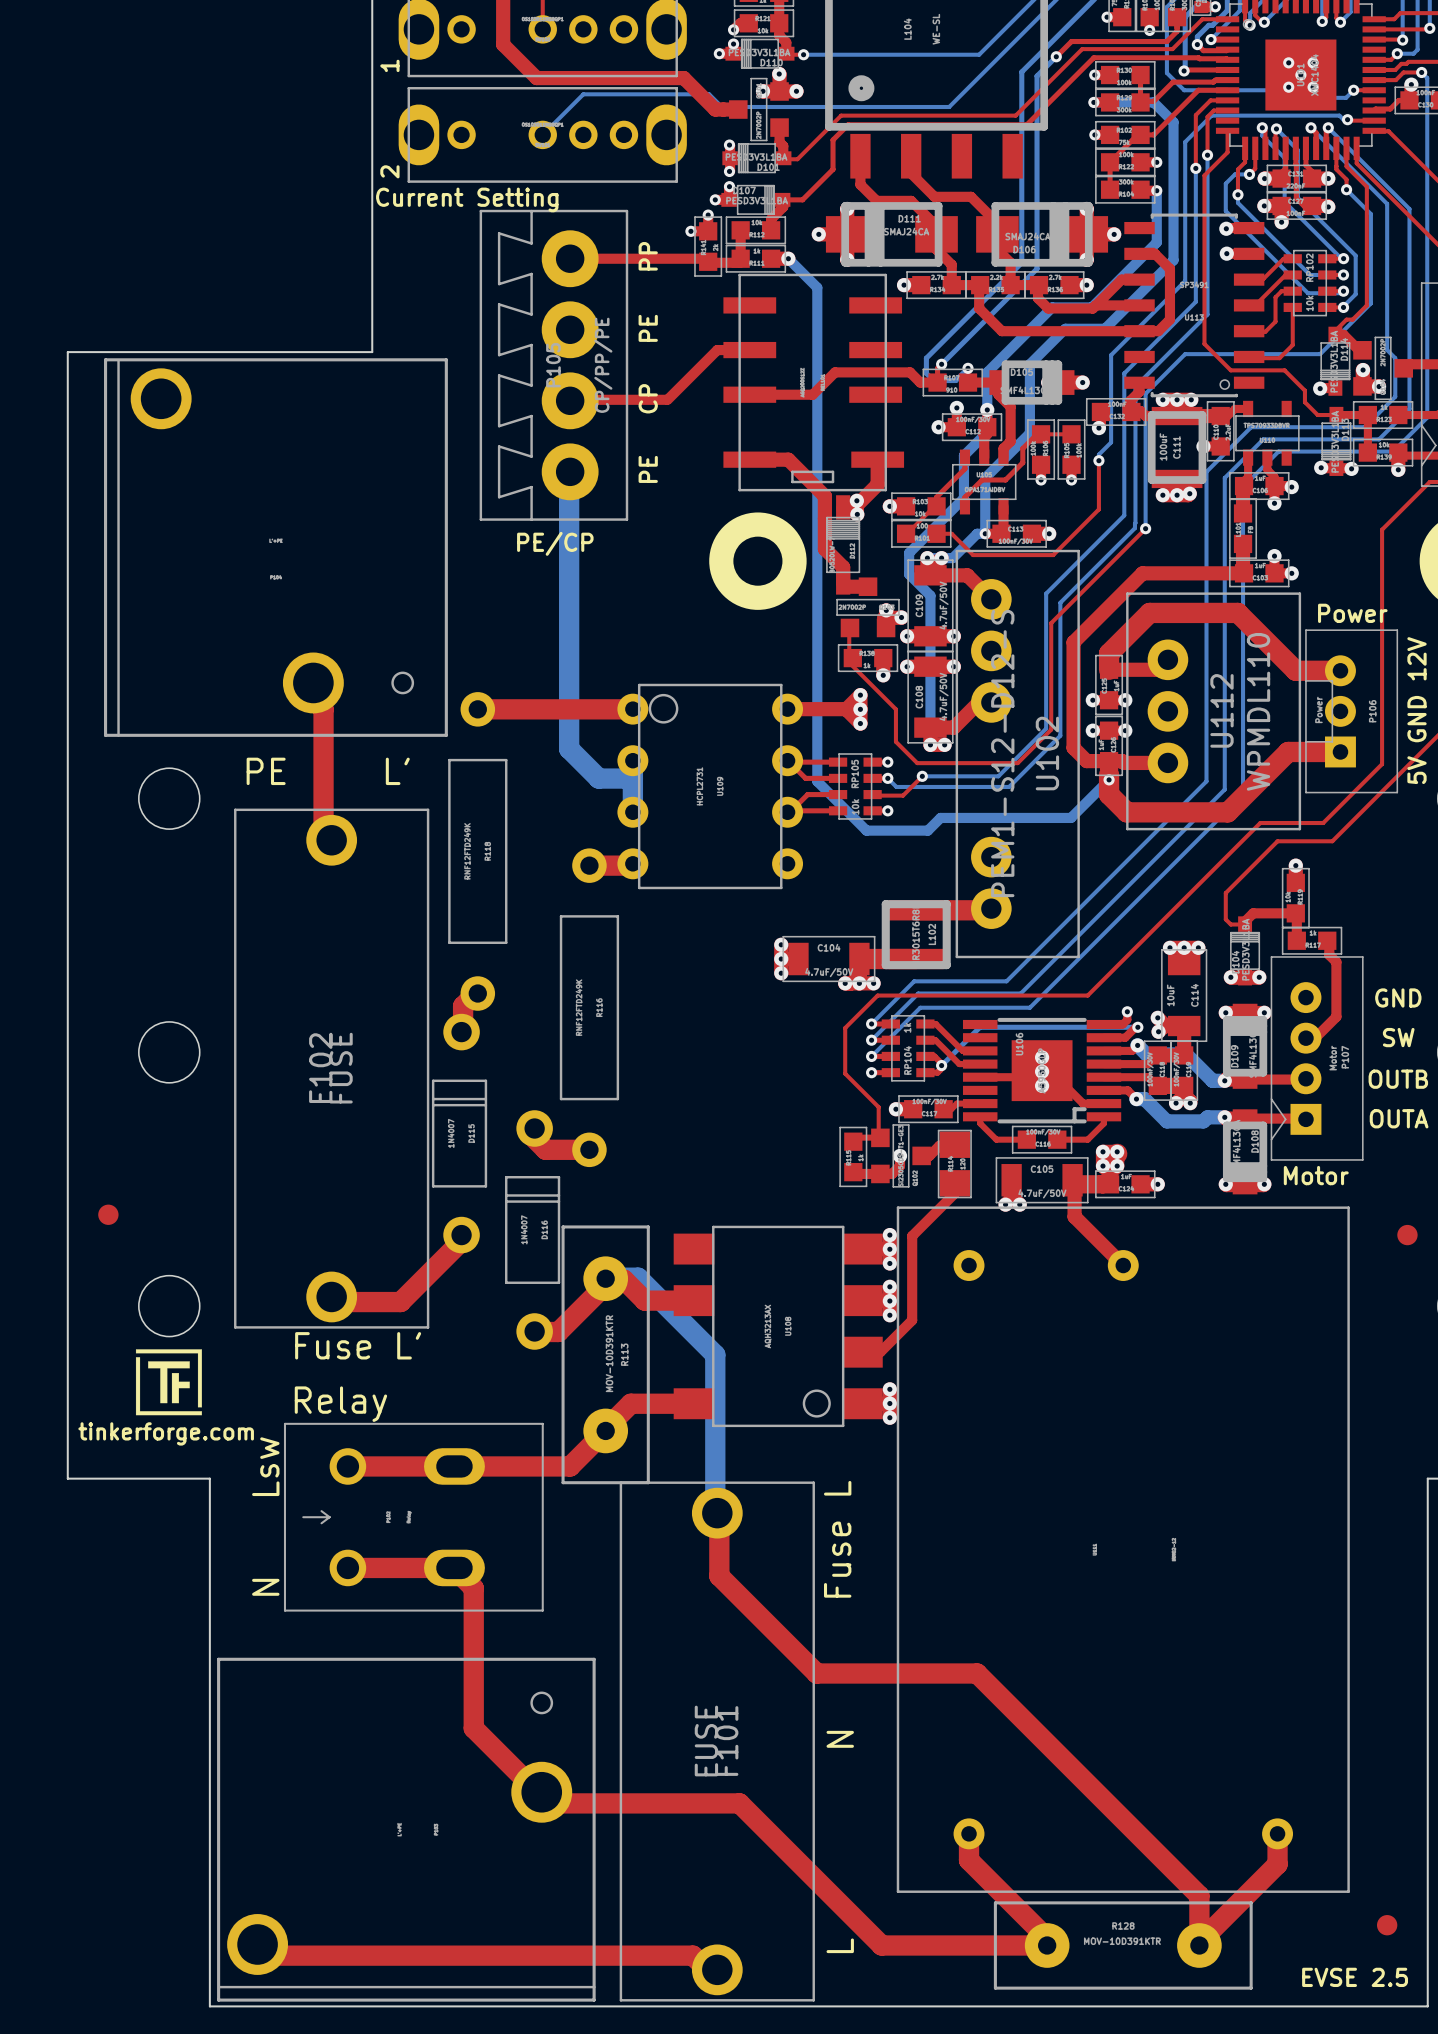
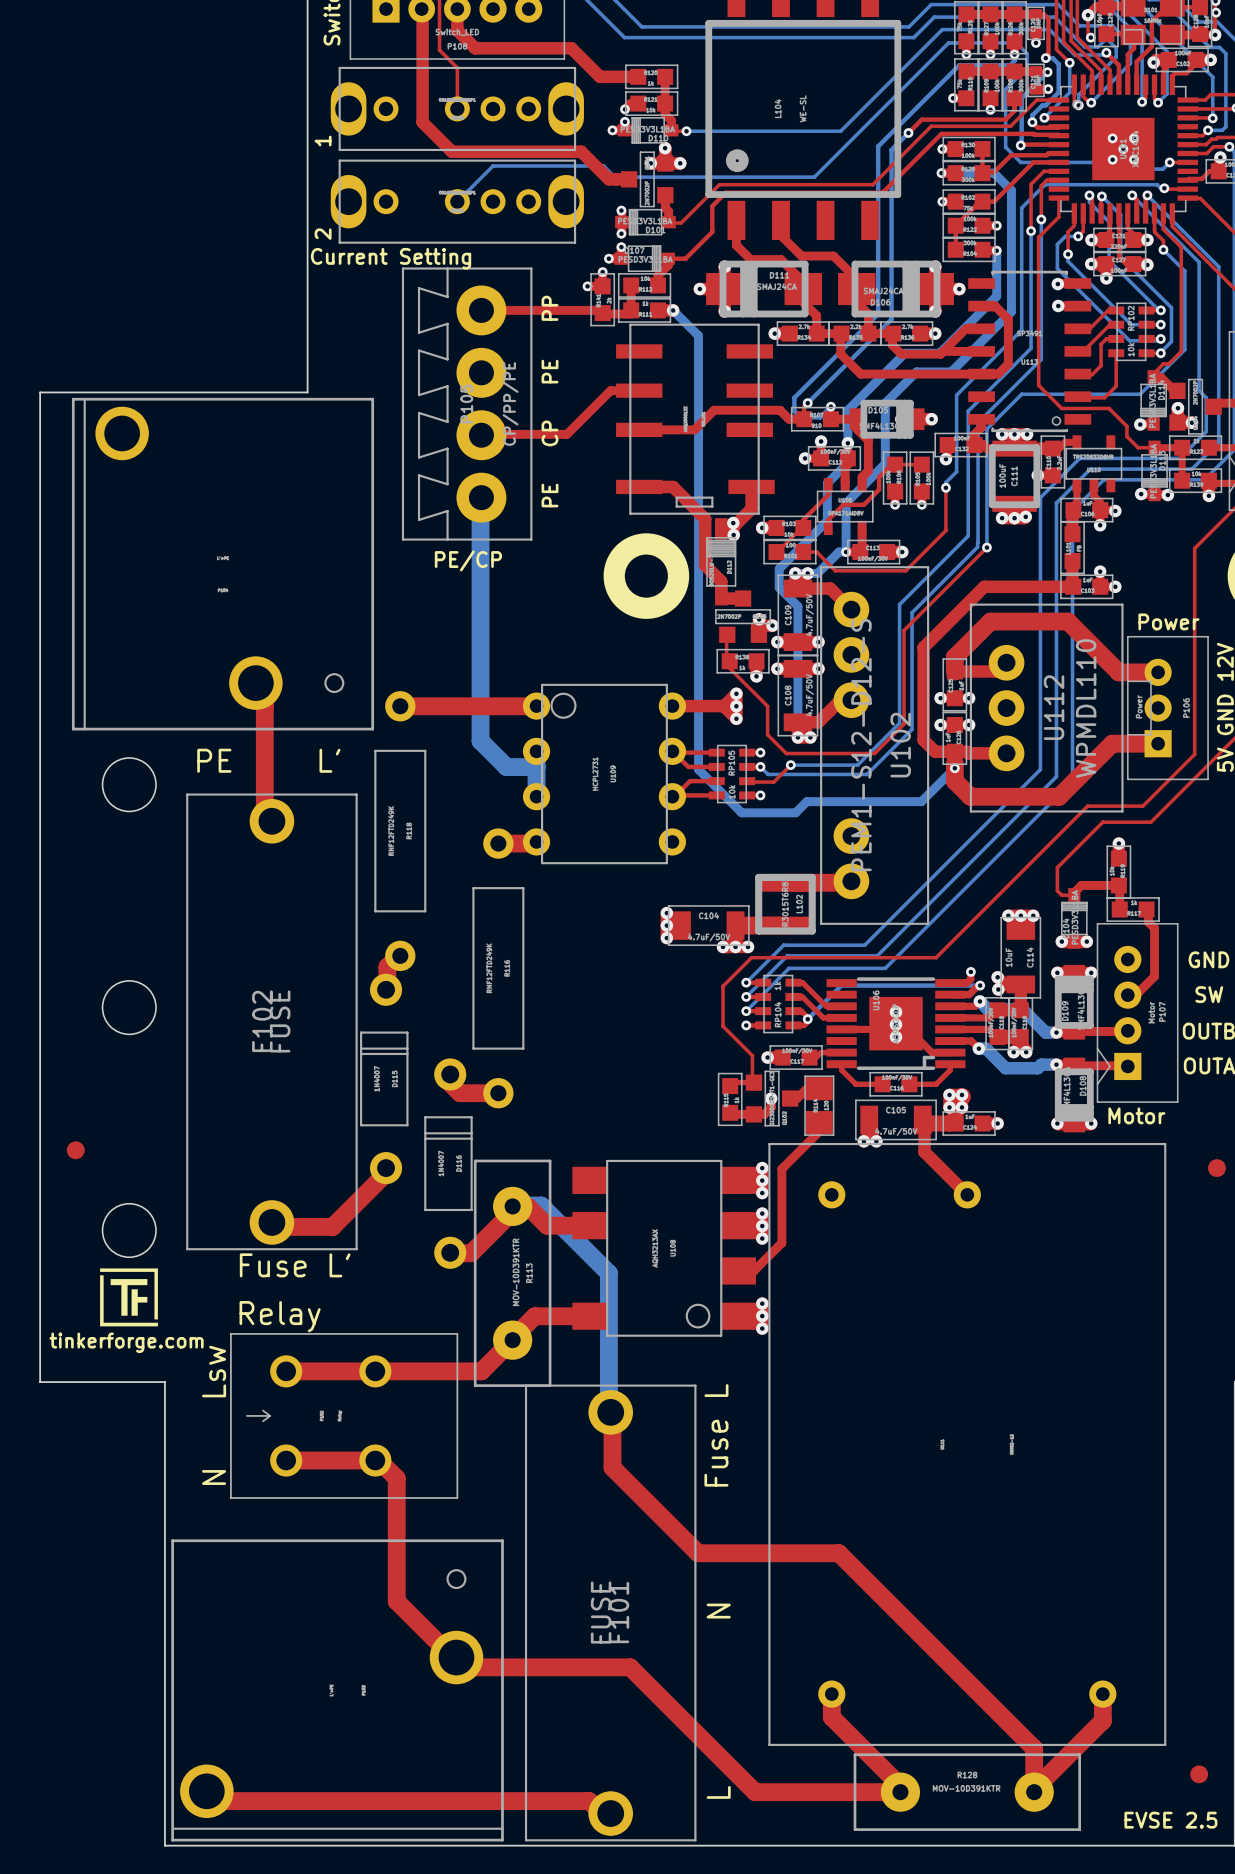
part footprint: [283, 1422, 544, 1612] -> [230, 1333, 459, 1499]

